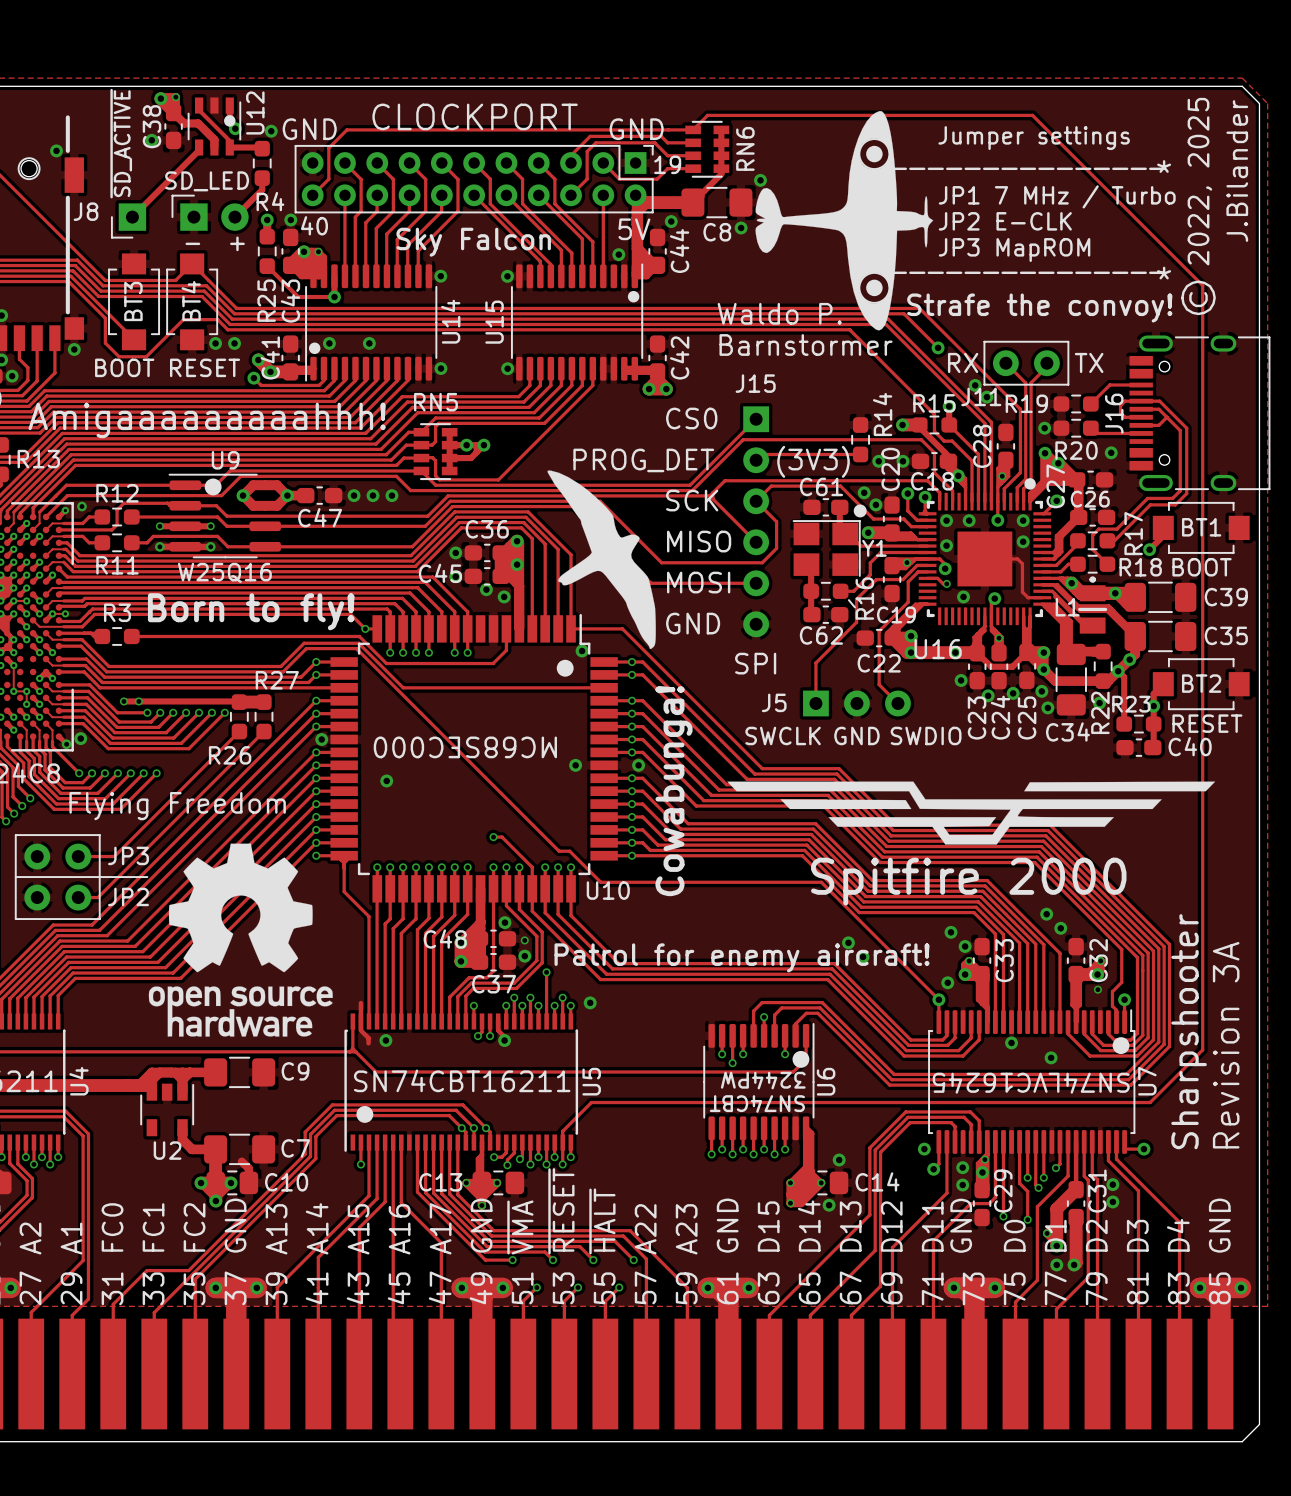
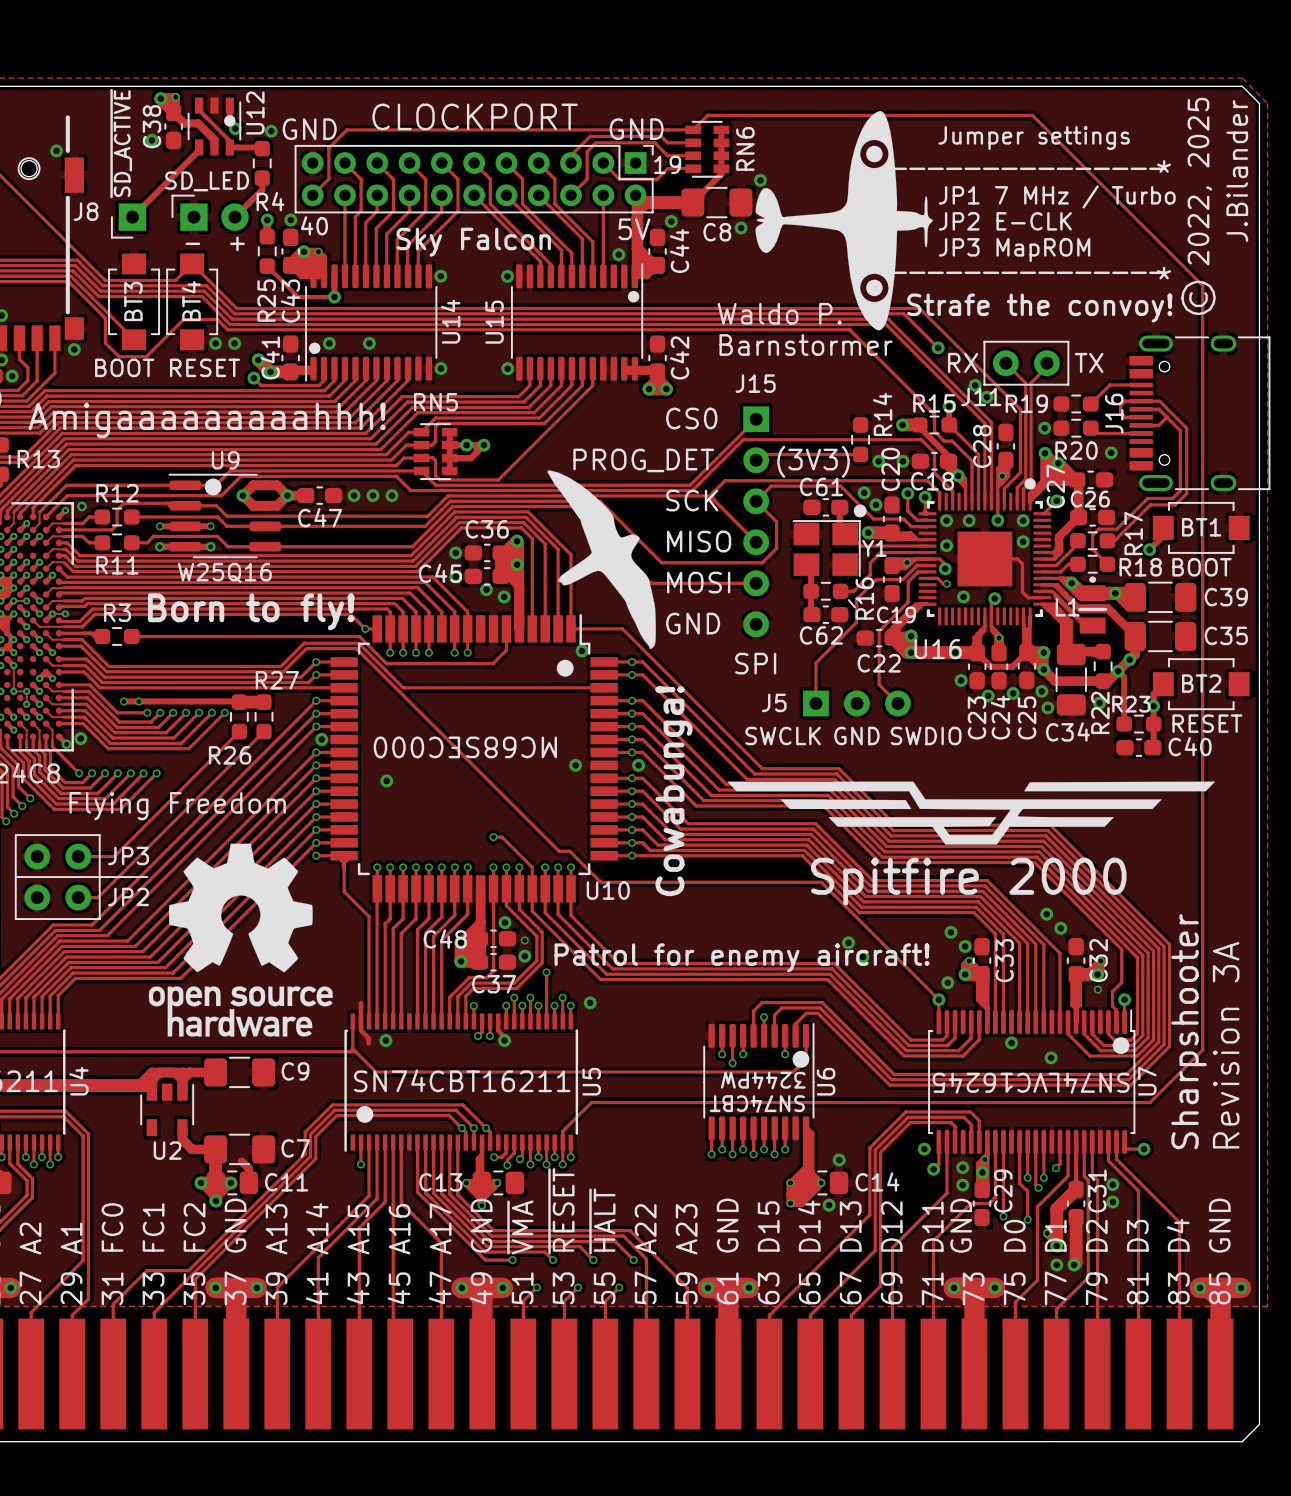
C10 name: C10 (286, 1182) -> C11 (286, 1182)

